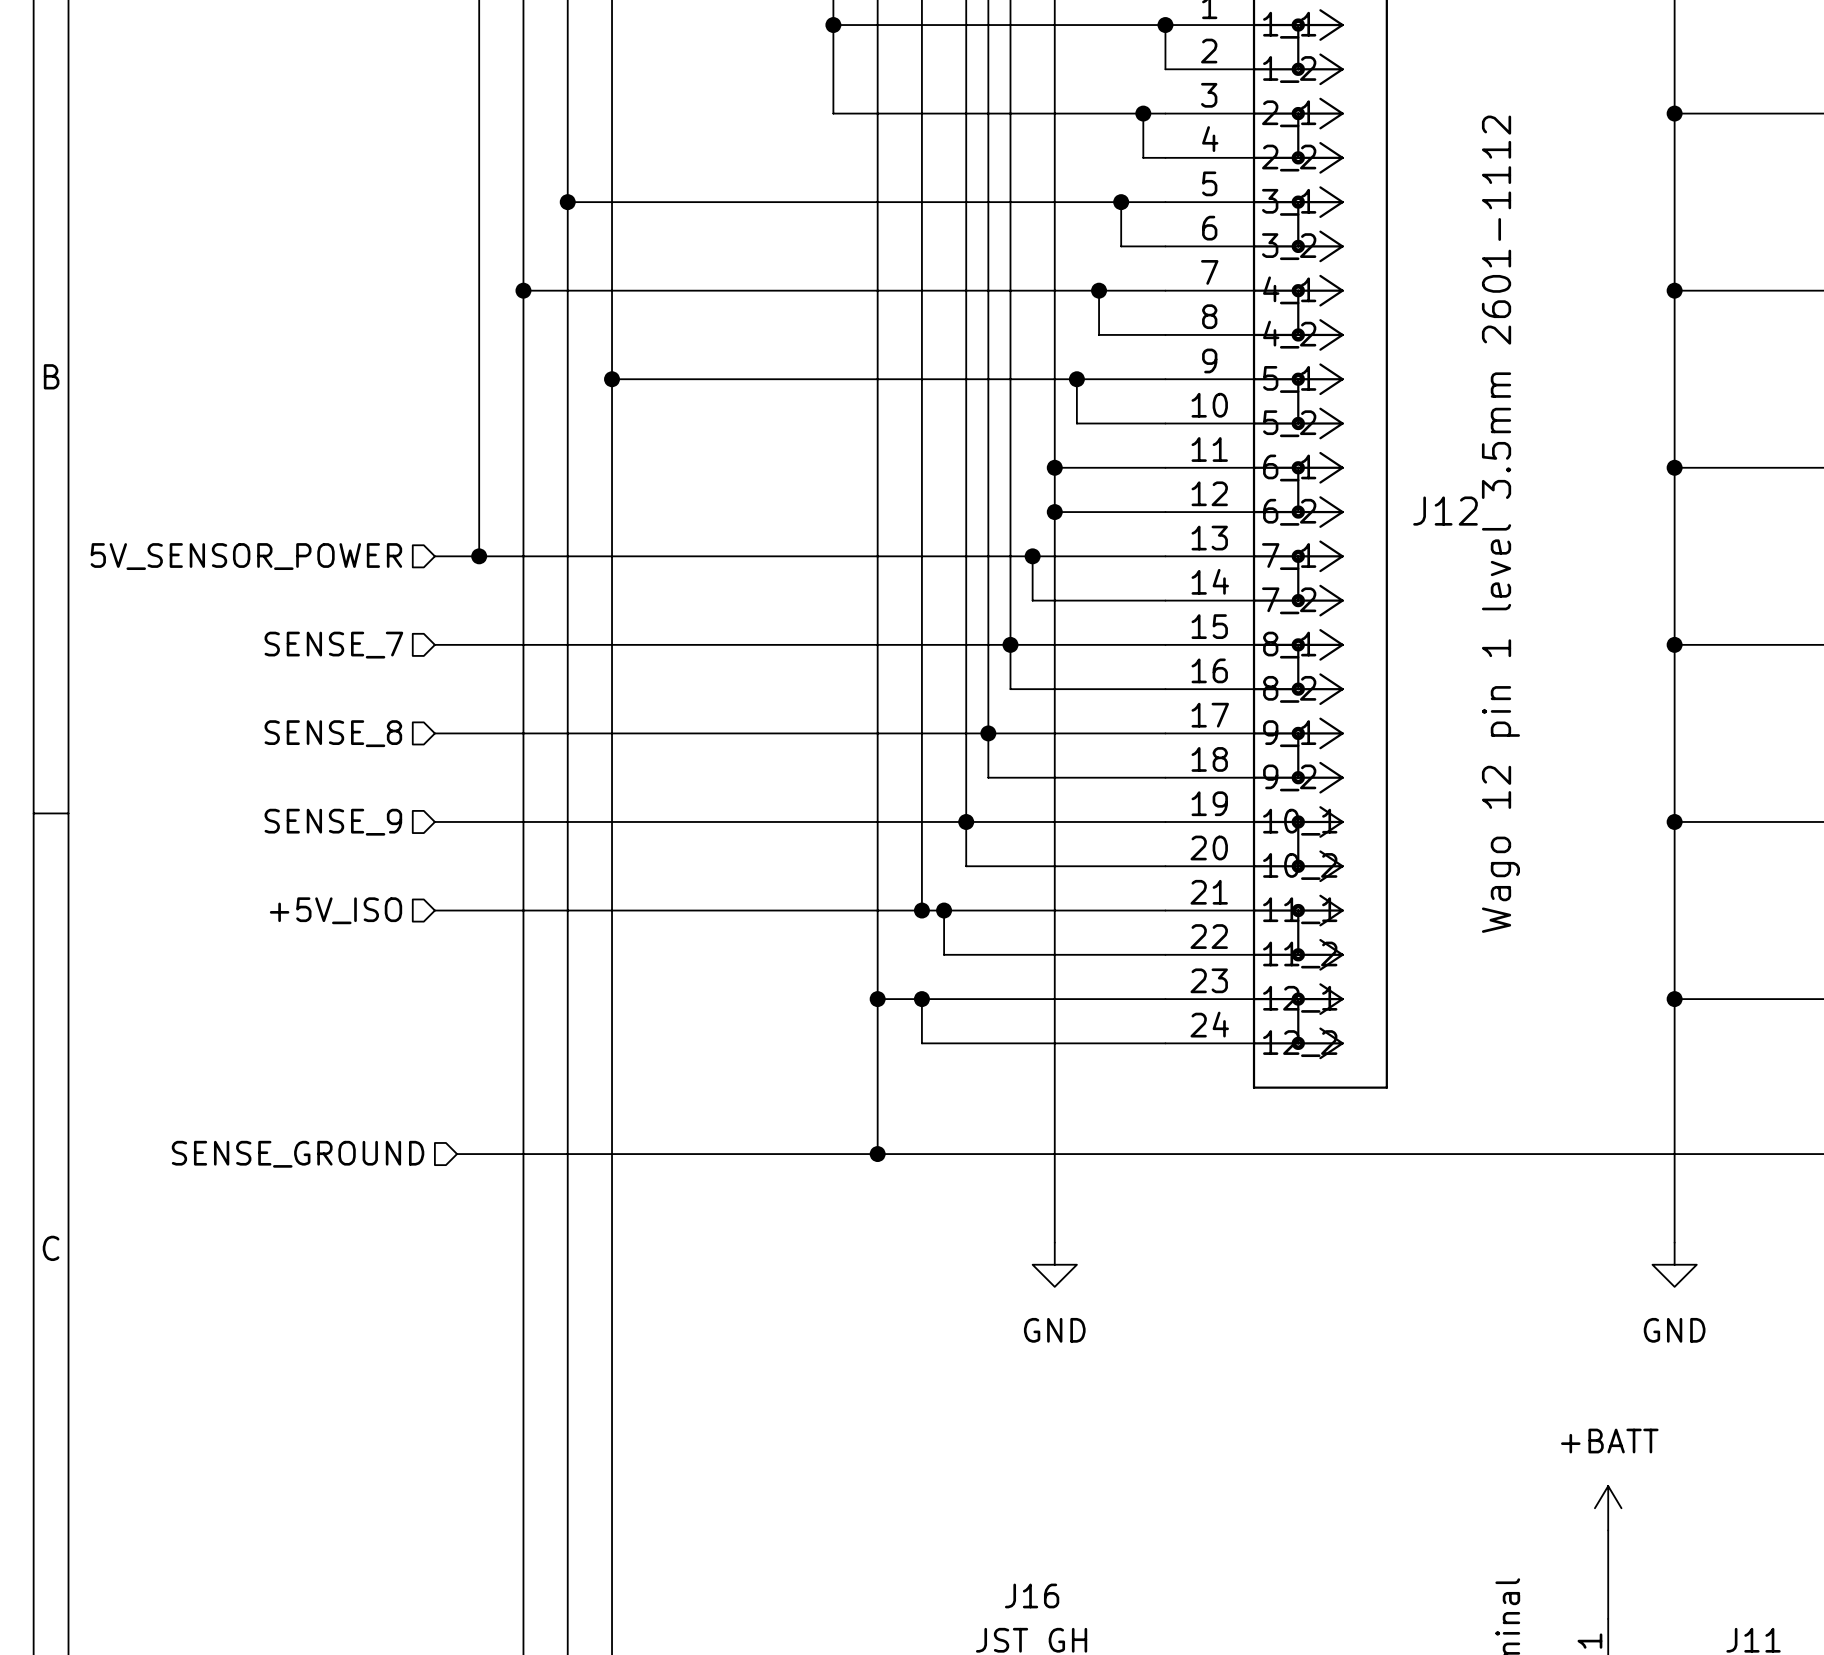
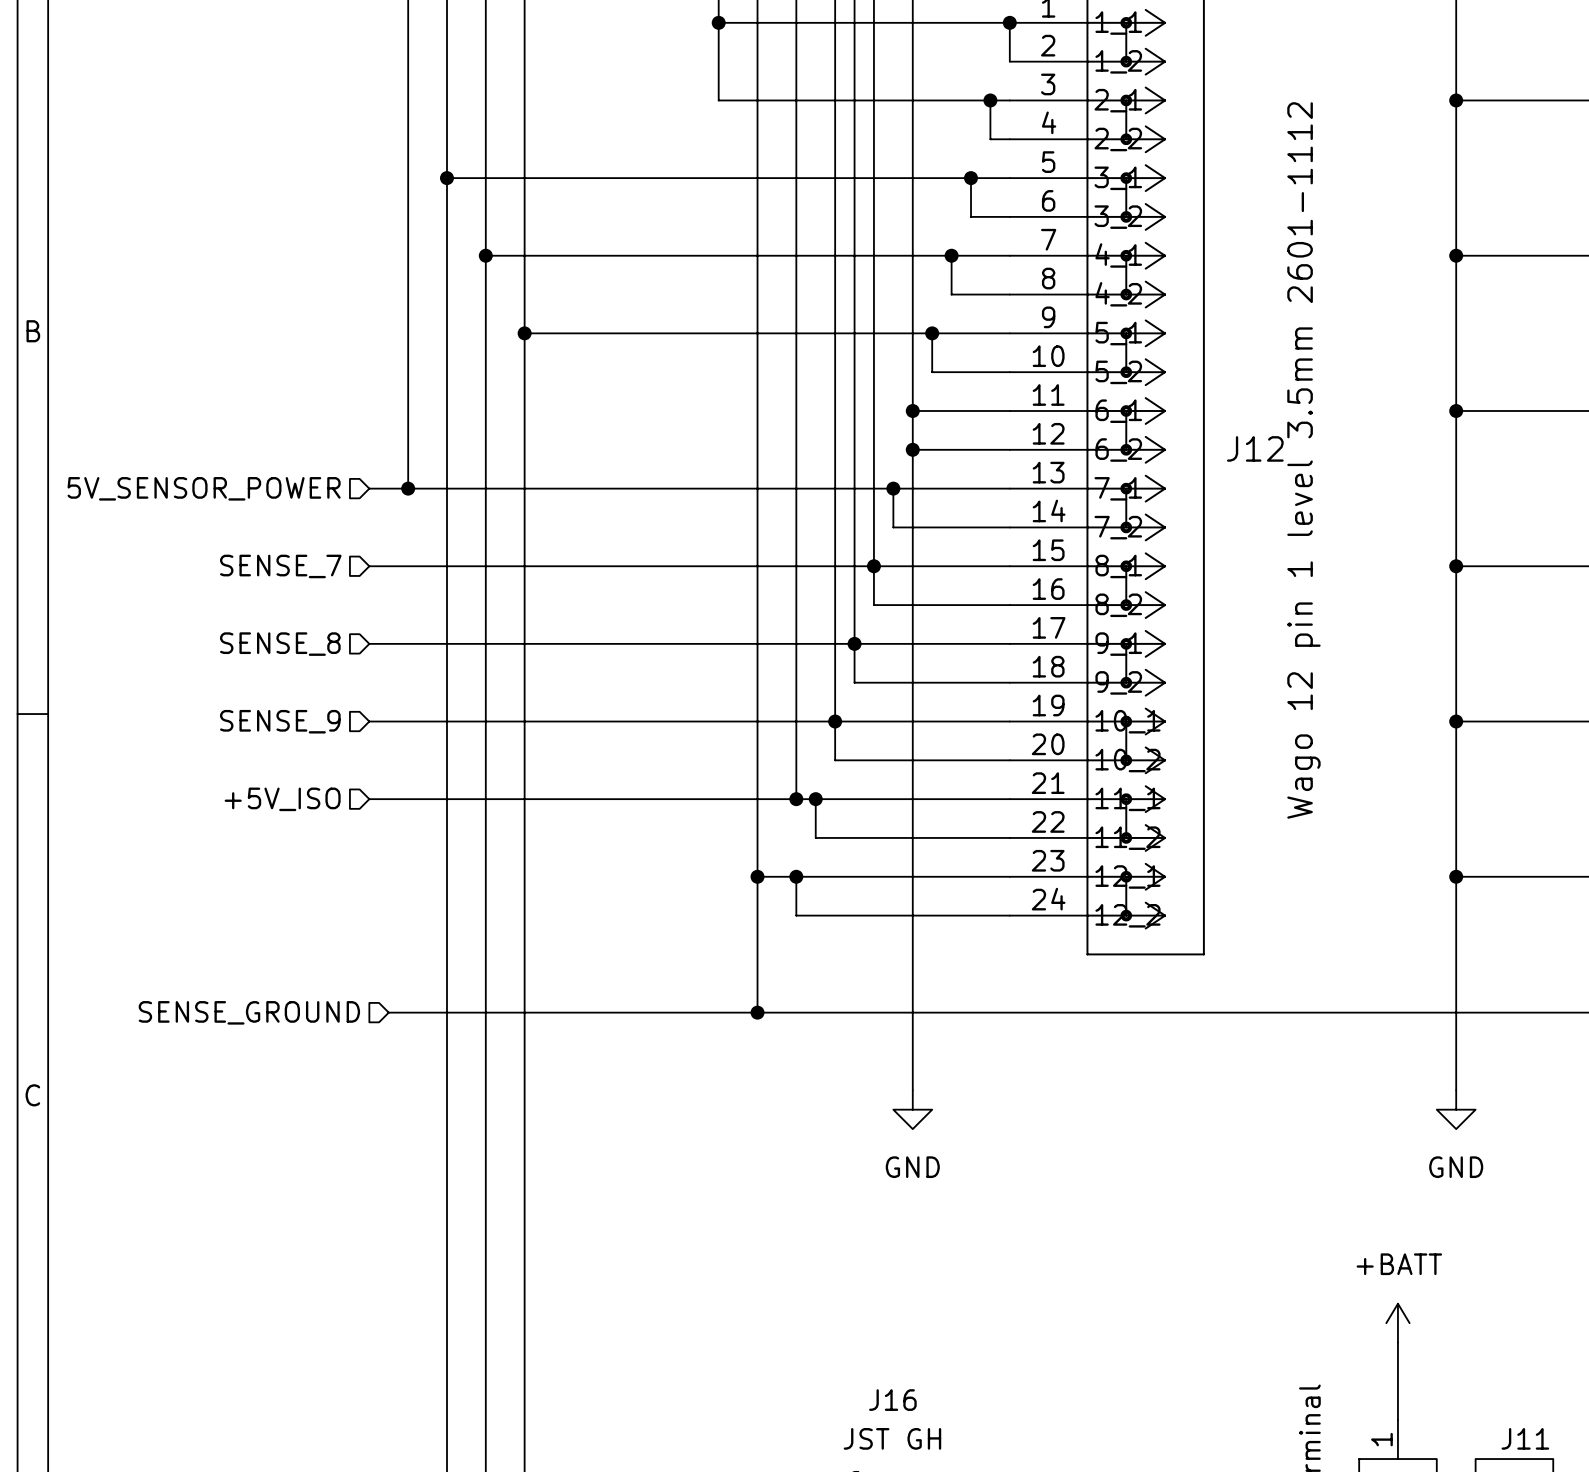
junction: none -> (446, 178)
junction: (567, 202) -> none
wire: (523, 290) (567, 290) -> (446, 178) (485, 178)
junction: (523, 290) -> none
junction: none -> (485, 255)

